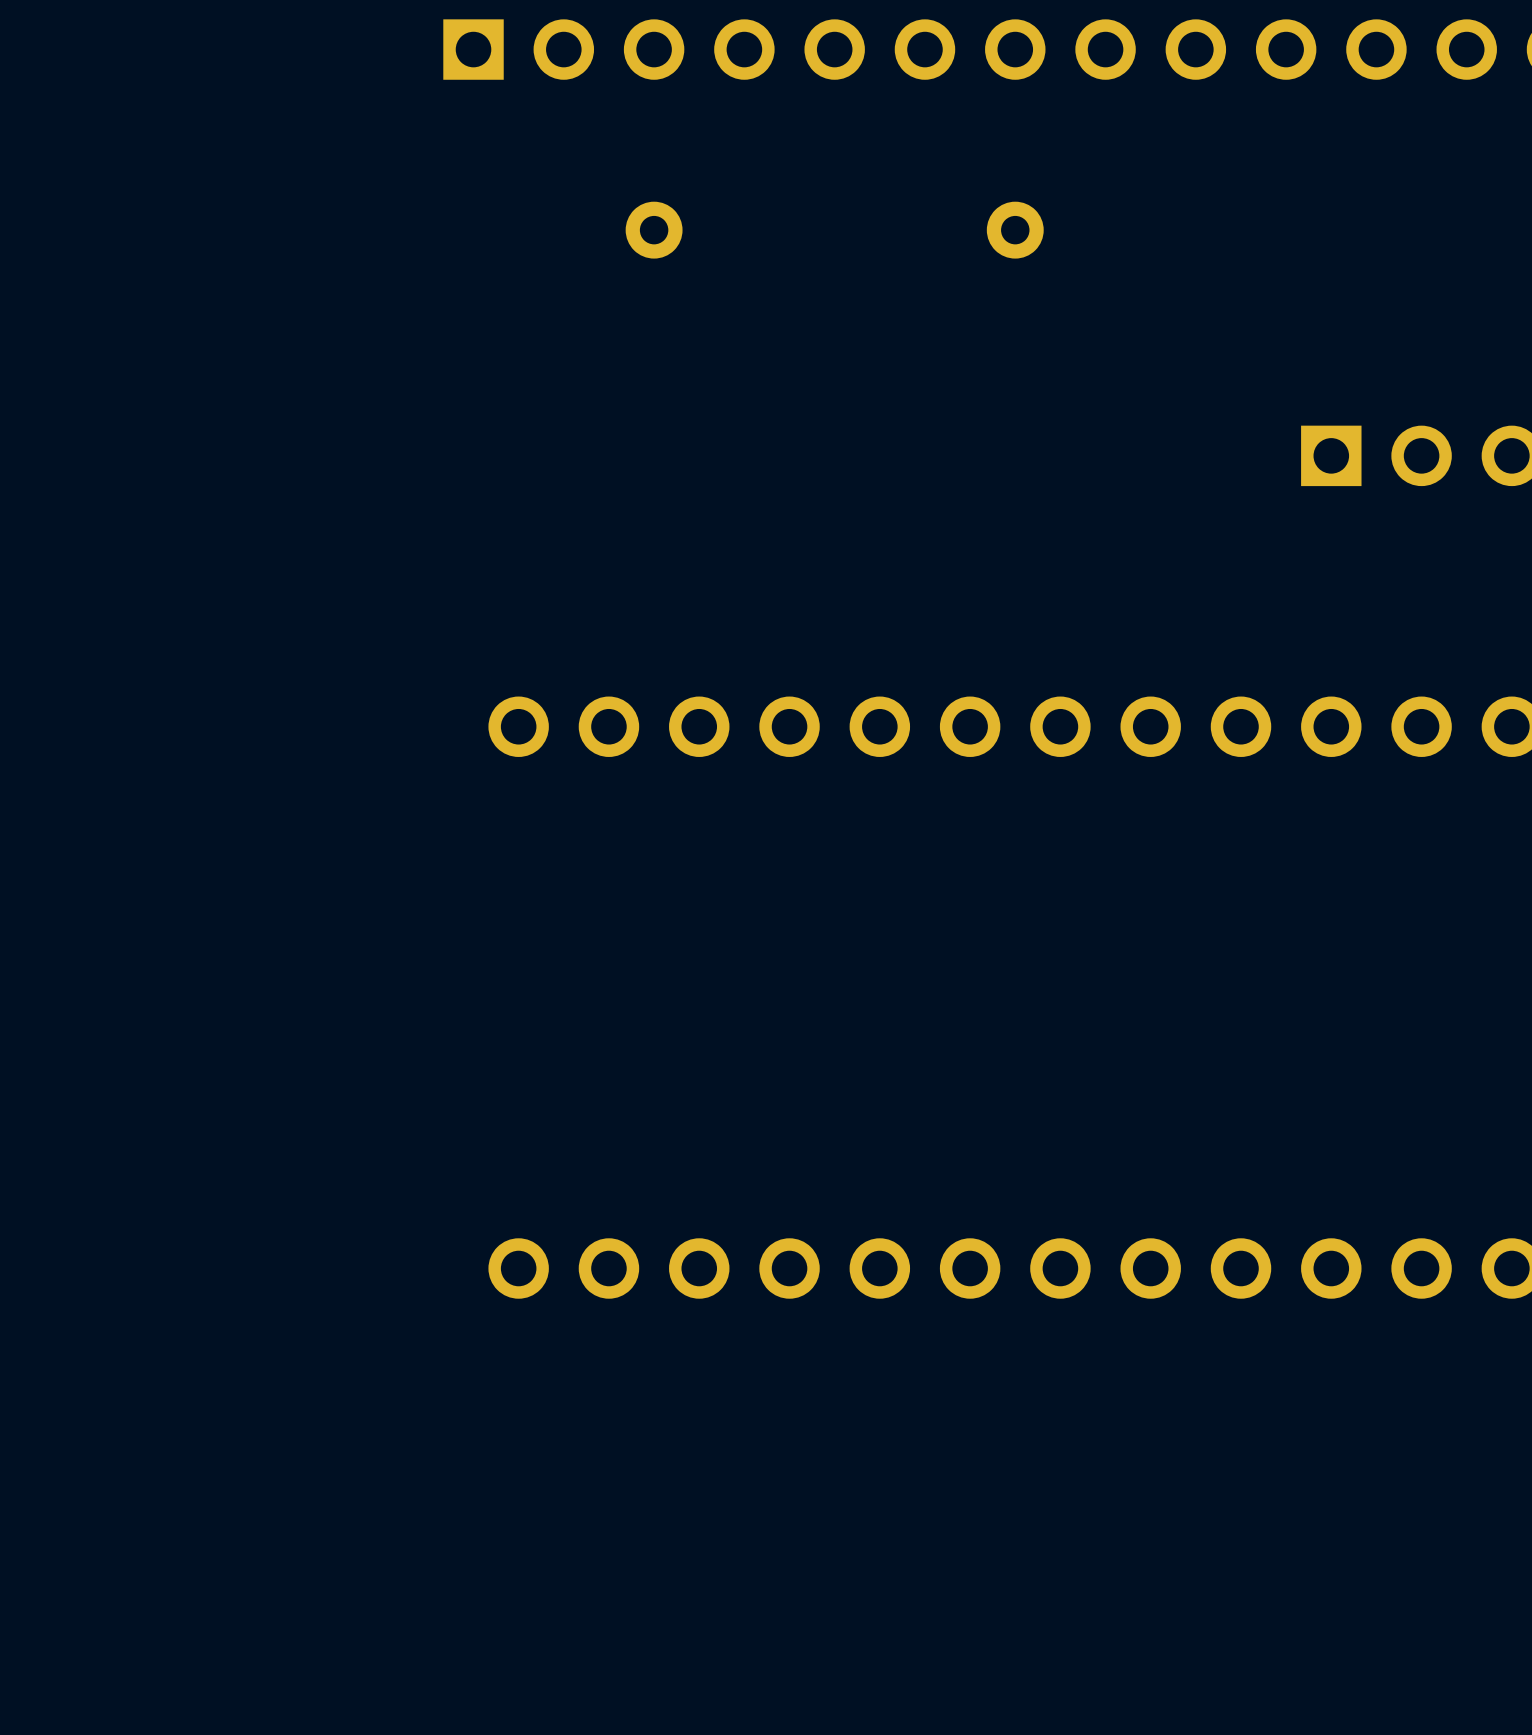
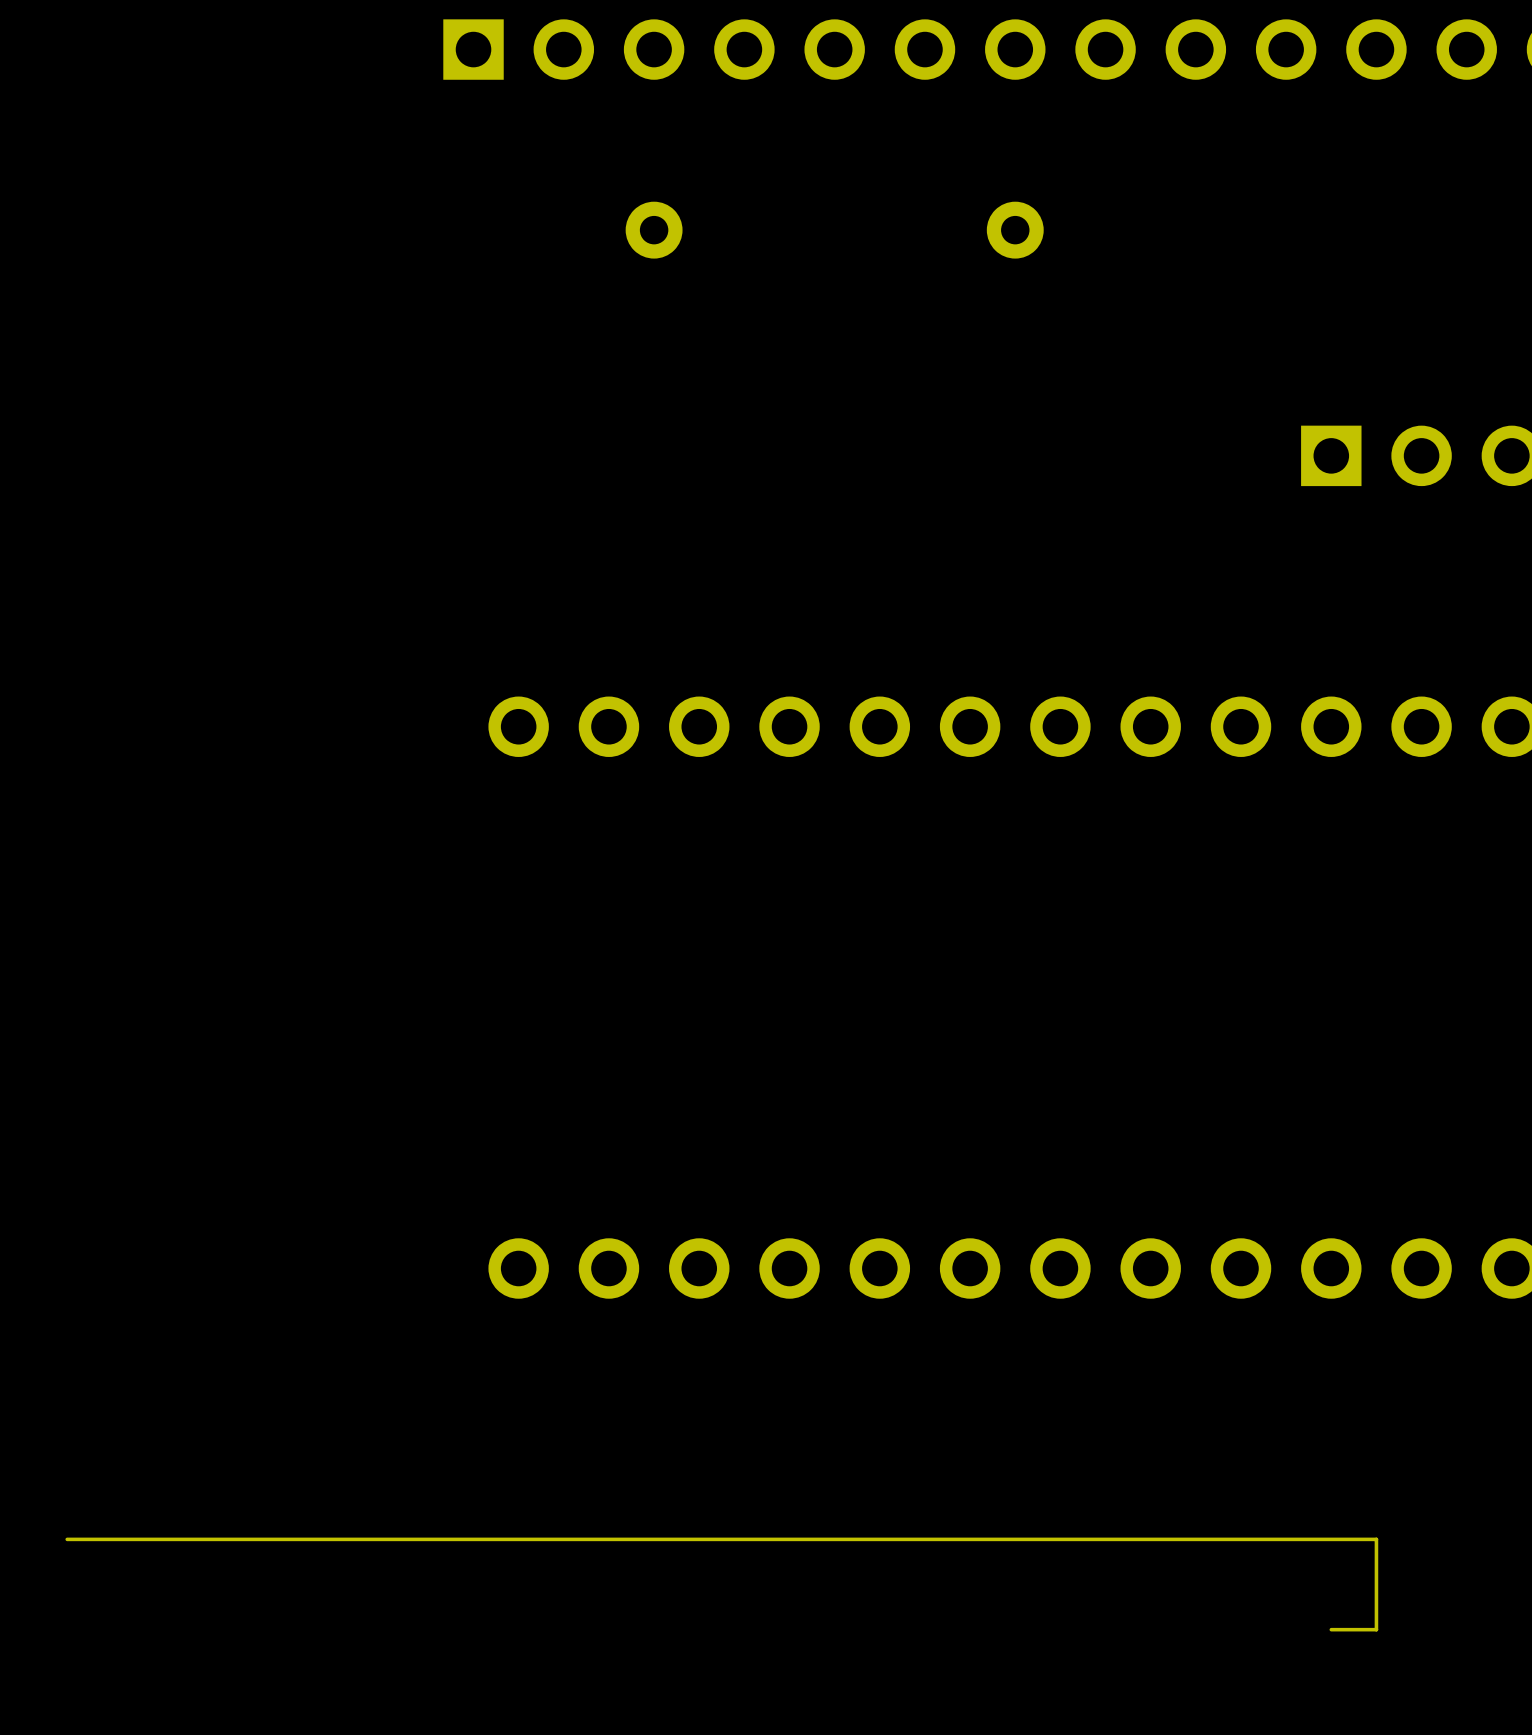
board edge: none -> (67, 1539) (1376, 1539) (1376, 1629) (1331, 1629)

